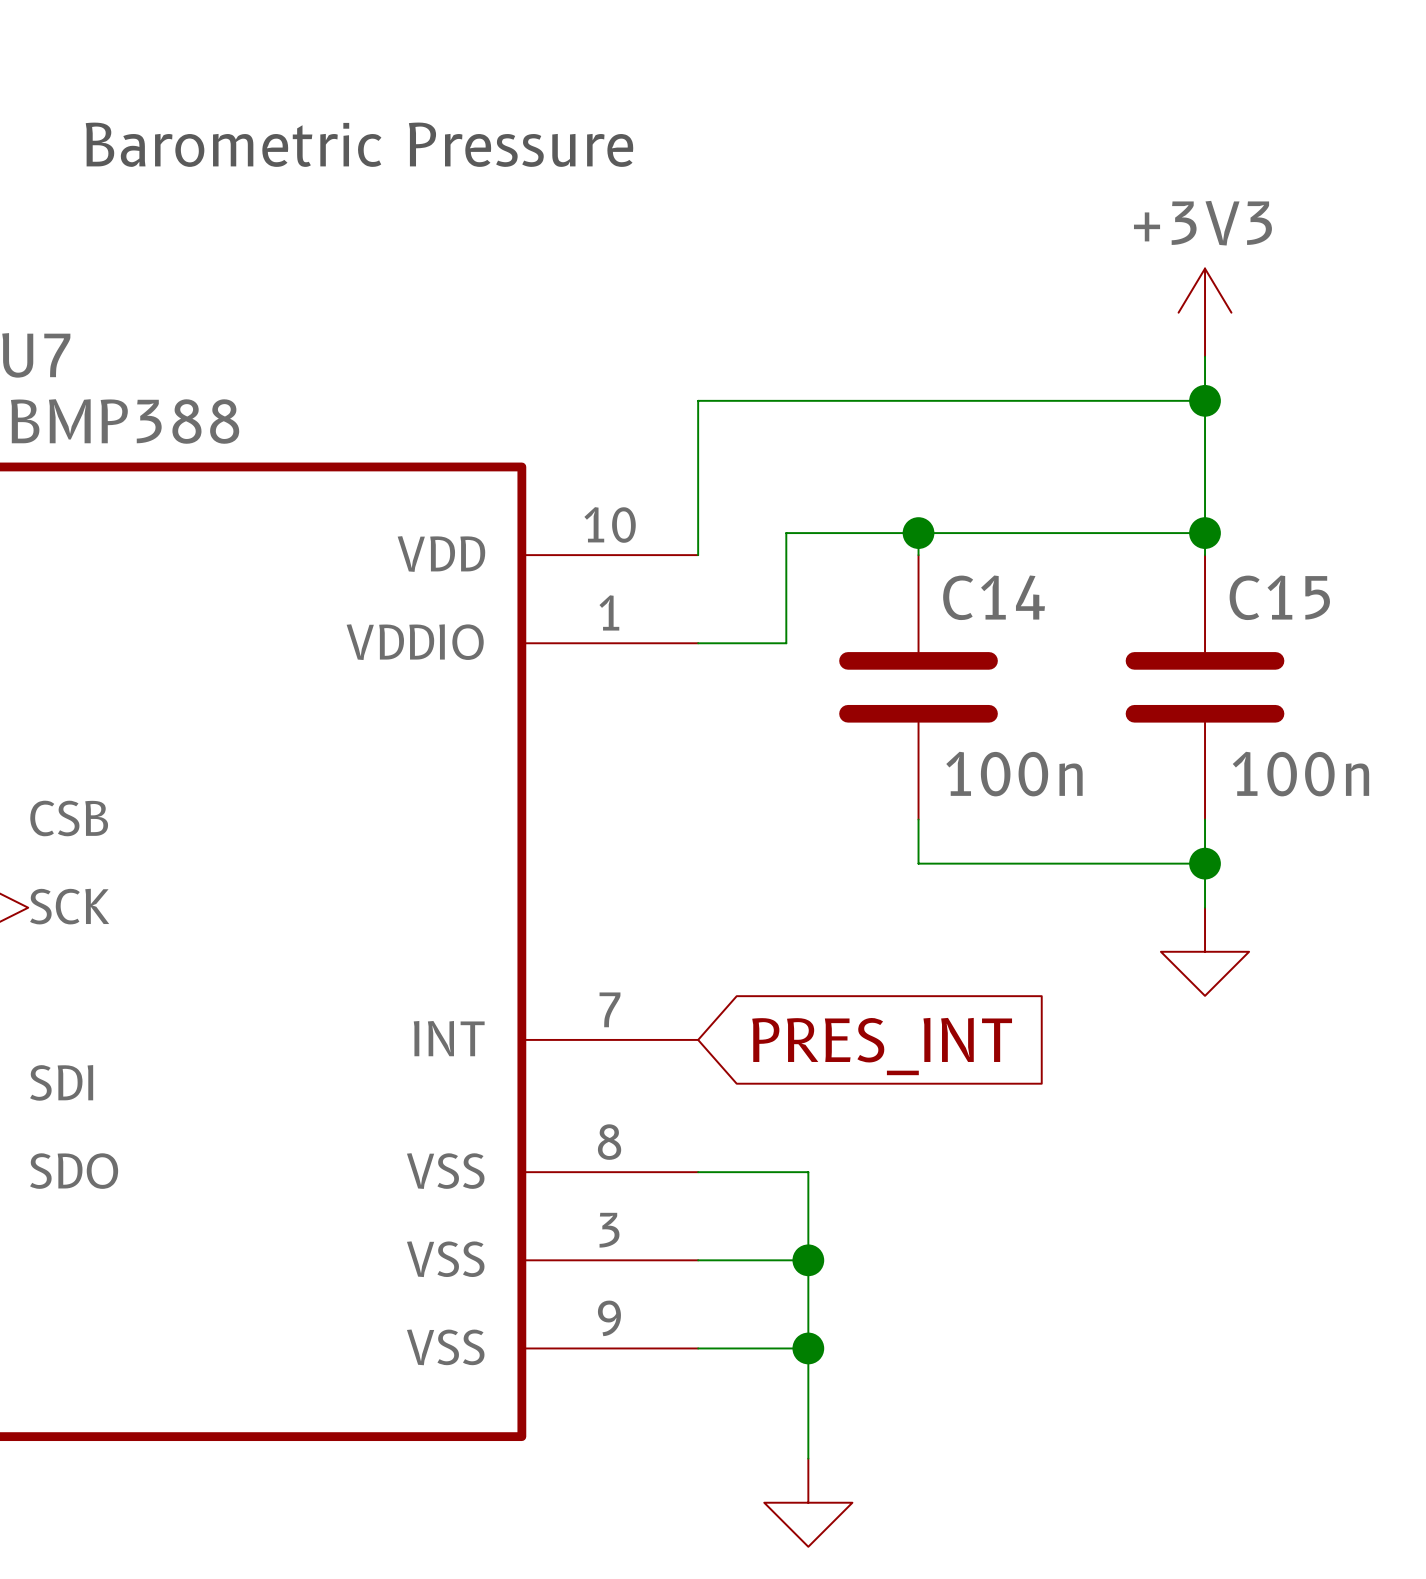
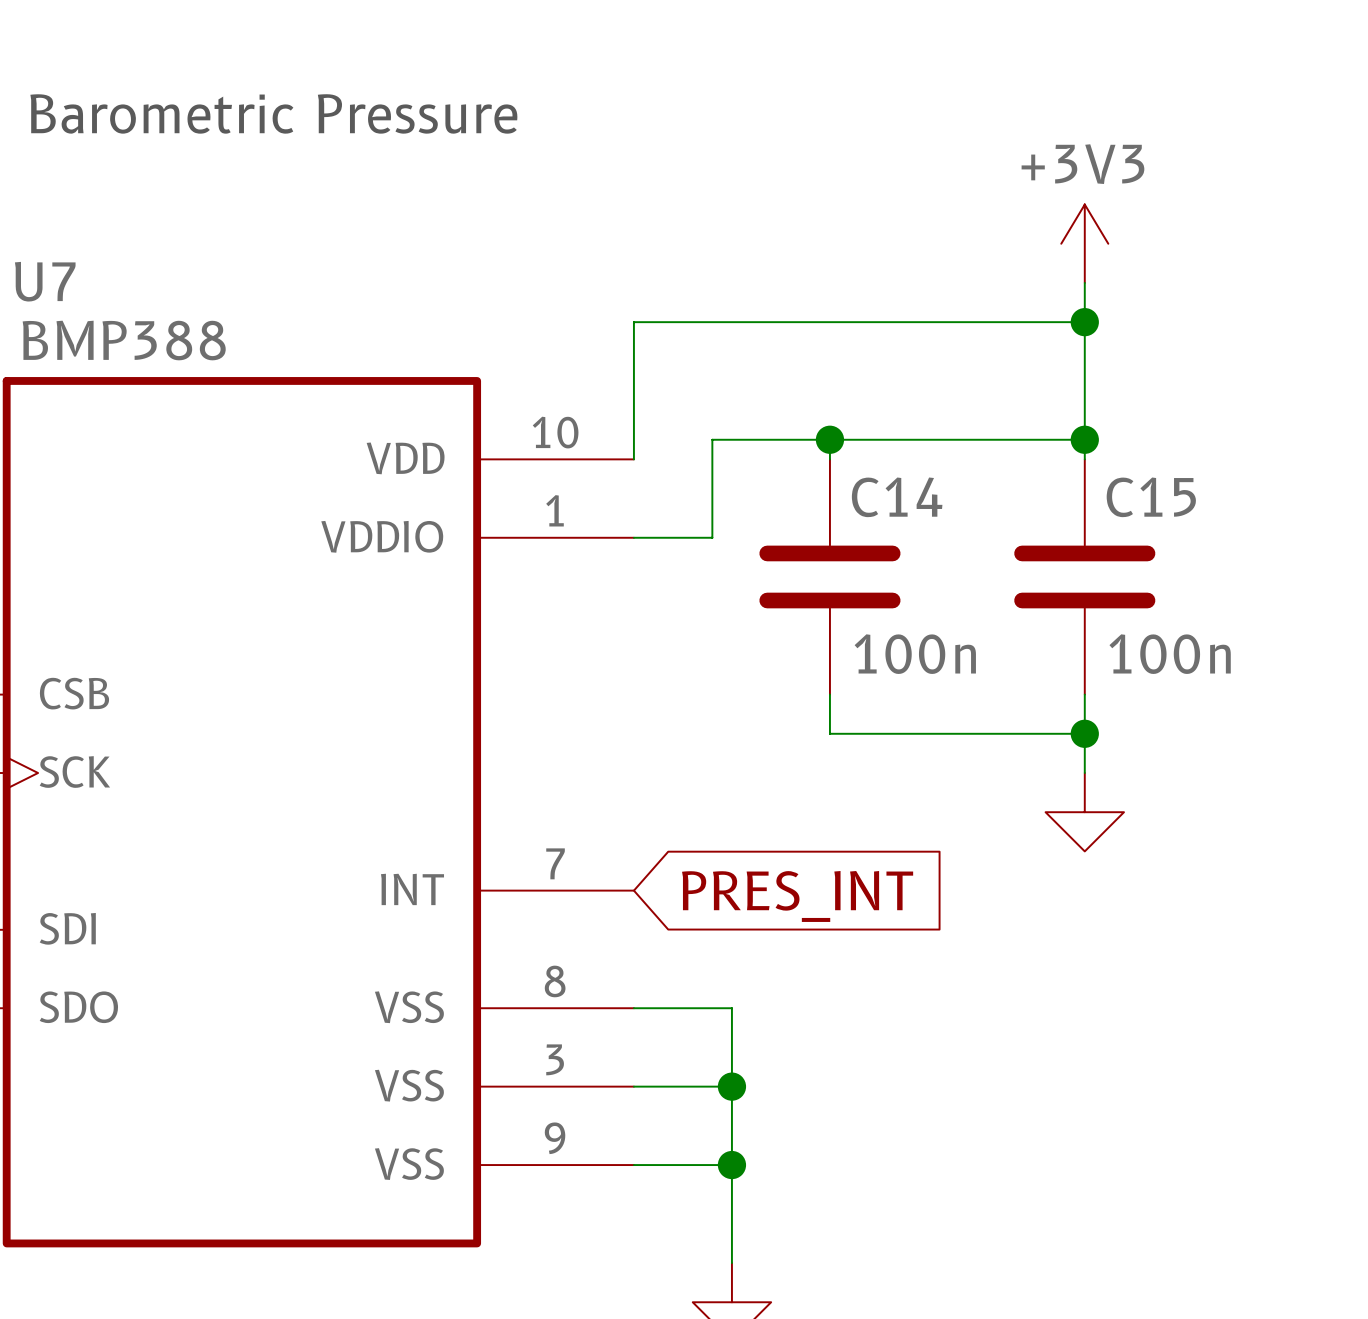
text position: Barometric Pressure (359, 144) -> Barometric Pressure (273, 113)

